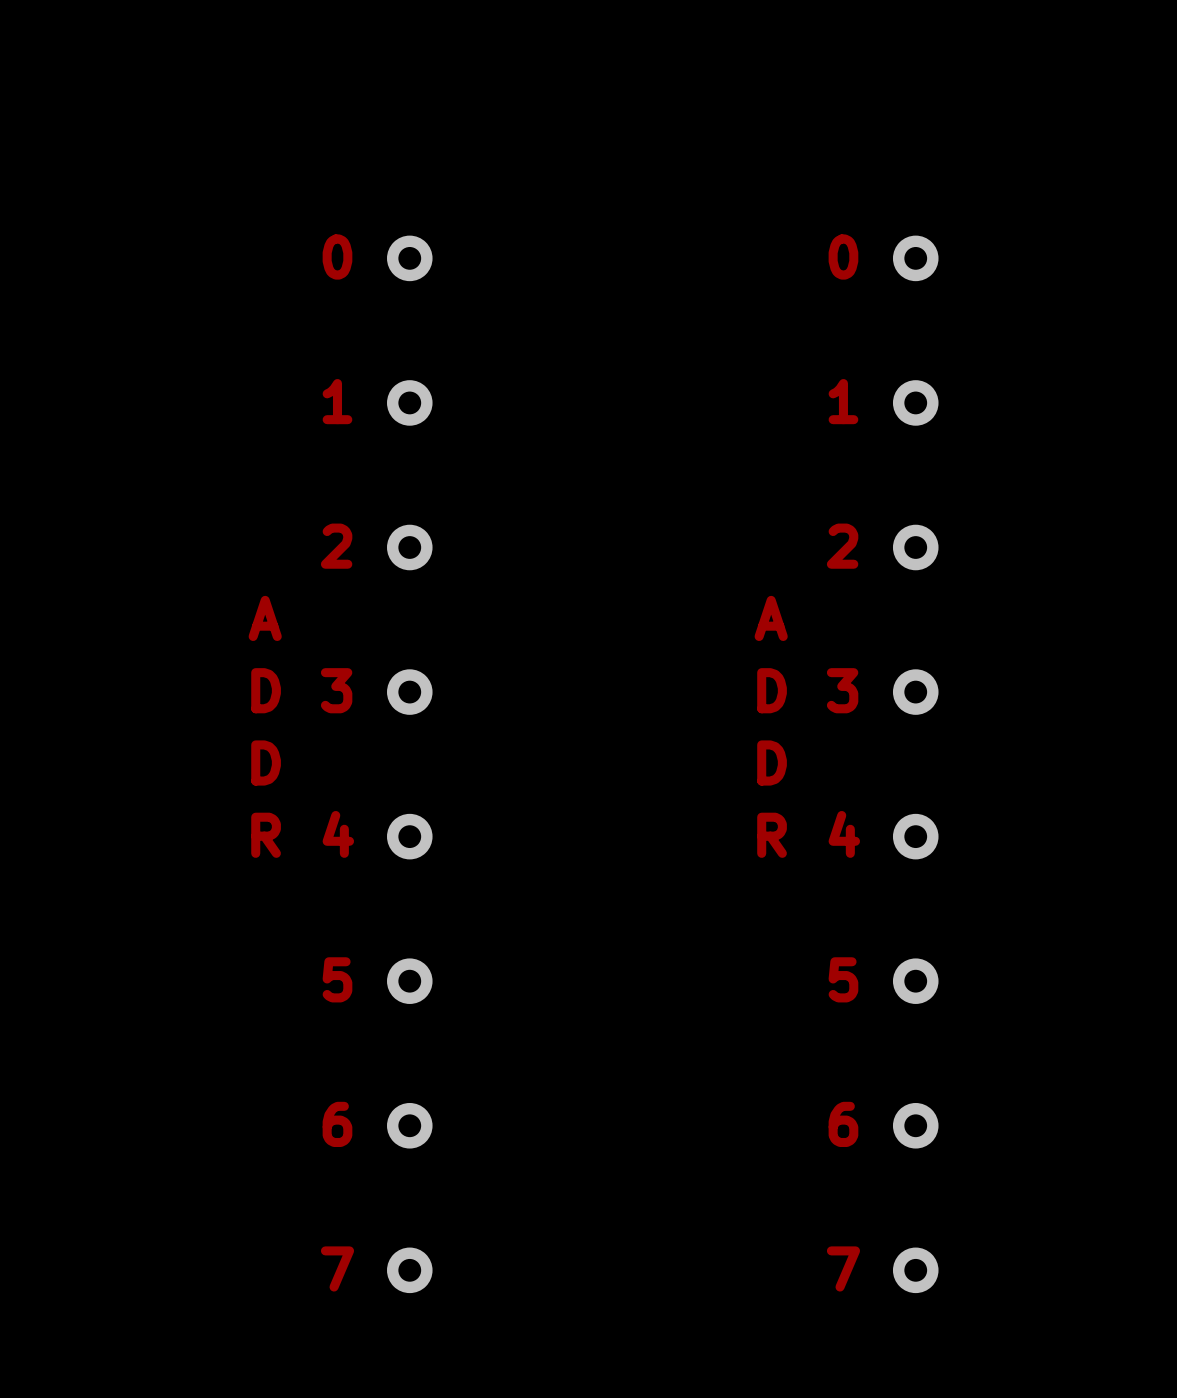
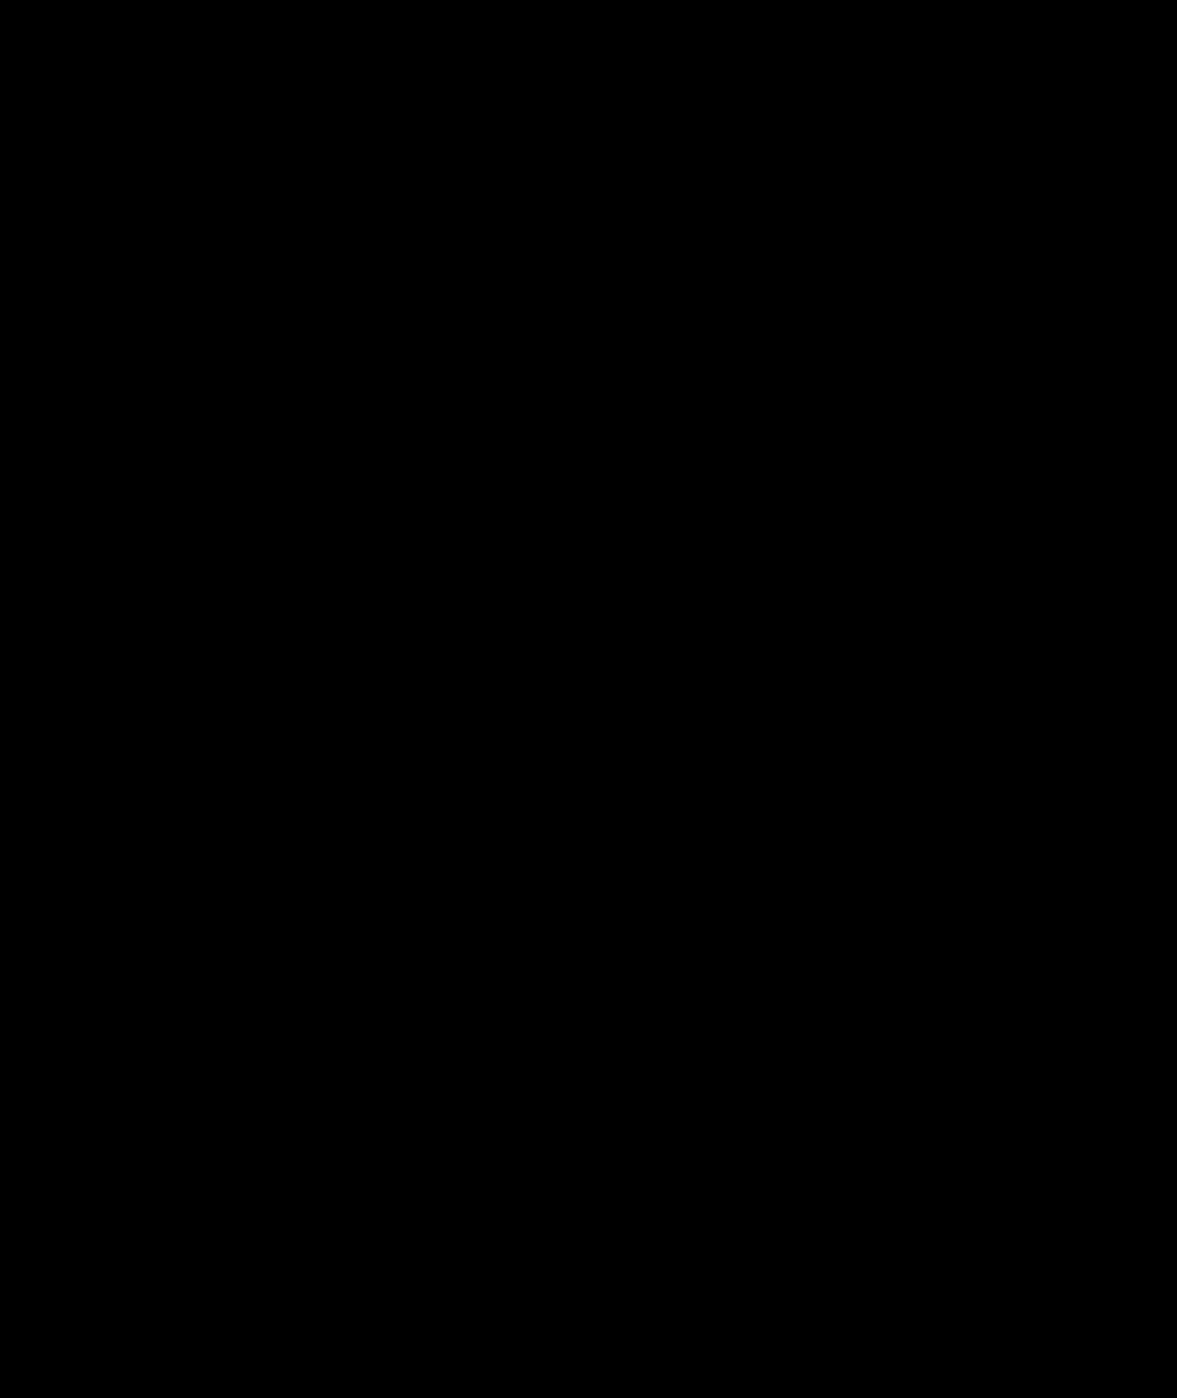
text: 0 (337, 257) -> none
text: 0 (843, 257) -> none
via: (409, 258) -> none
via: (915, 258) -> none
text: 1 (337, 401) -> none
text: 1 (843, 401) -> none
via: (409, 402) -> none
via: (915, 402) -> none
text: 2 (336, 546) -> none
text: 2 (842, 546) -> none
via: (409, 547) -> none
via: (915, 547) -> none
text: A (265, 618) -> none
text: A (771, 618) -> none
text: D (266, 690) -> none
text: 3 (336, 690) -> none
text: D (772, 690) -> none
text: 3 (842, 690) -> none
via: (409, 692) -> none
via: (915, 692) -> none
text: D (266, 763) -> none
text: D (772, 763) -> none
text: 4 (338, 834) -> none
text: 4 (844, 834) -> none
text: R (266, 835) -> none
text: R (772, 835) -> none
via: (409, 836) -> none
via: (915, 836) -> none
text: 5 (337, 979) -> none
text: 5 (843, 979) -> none
via: (409, 981) -> none
via: (915, 981) -> none
text: 6 (337, 1124) -> none
text: 6 (843, 1124) -> none
via: (409, 1125) -> none
via: (915, 1125) -> none
text: 7 (337, 1268) -> none
text: 7 (843, 1268) -> none
via: (409, 1270) -> none
via: (915, 1270) -> none

